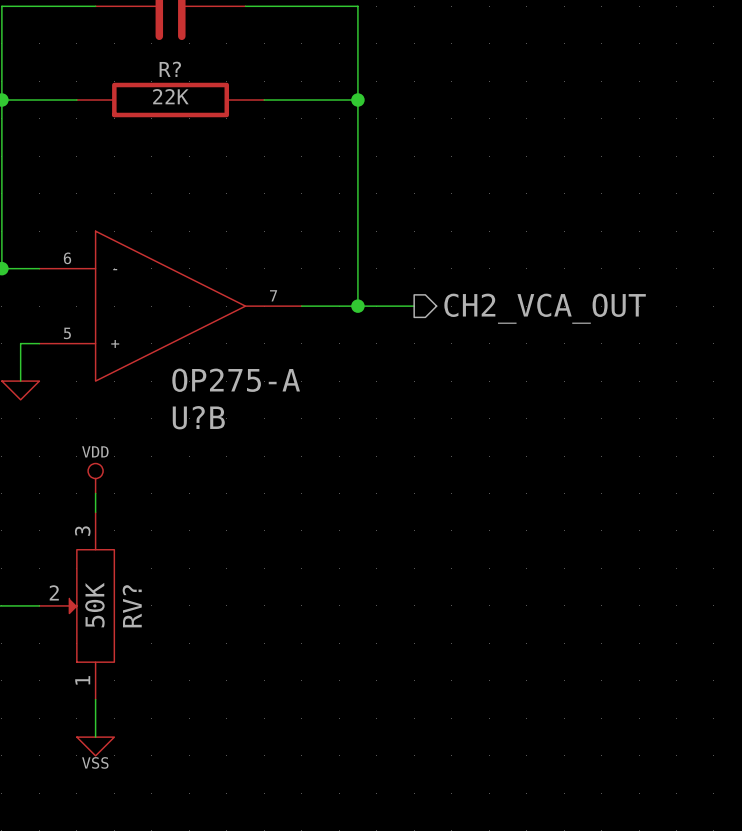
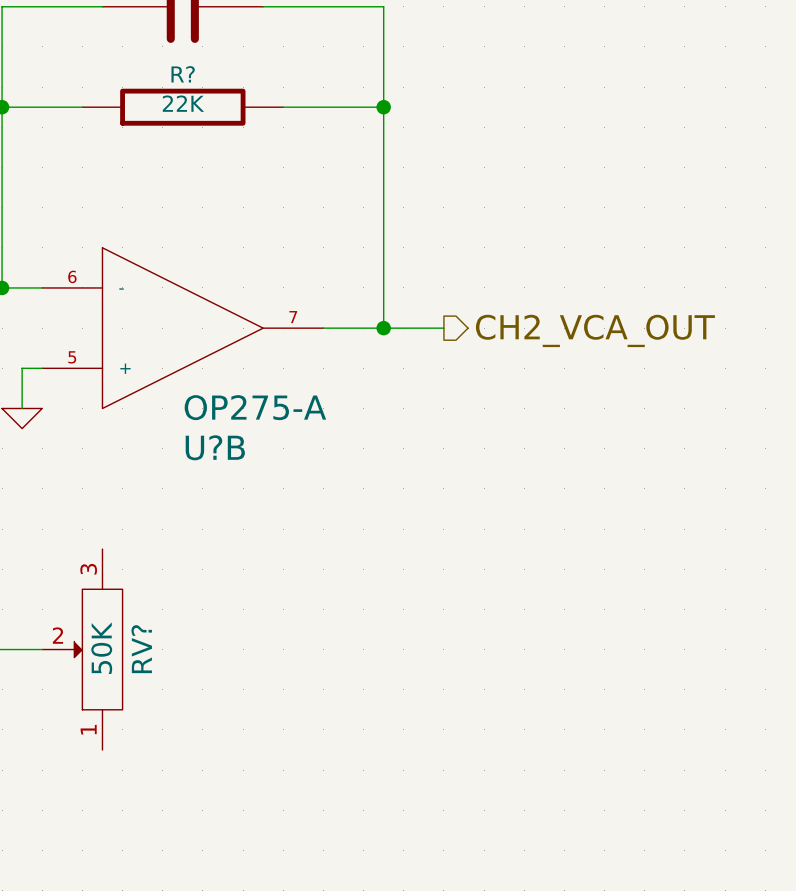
power symbol: VDD (95, 478) -> none
wire: (95, 493) (95, 512) -> none
wire: (95, 699) (95, 737) -> none
power symbol: VSS (95, 746) -> none

